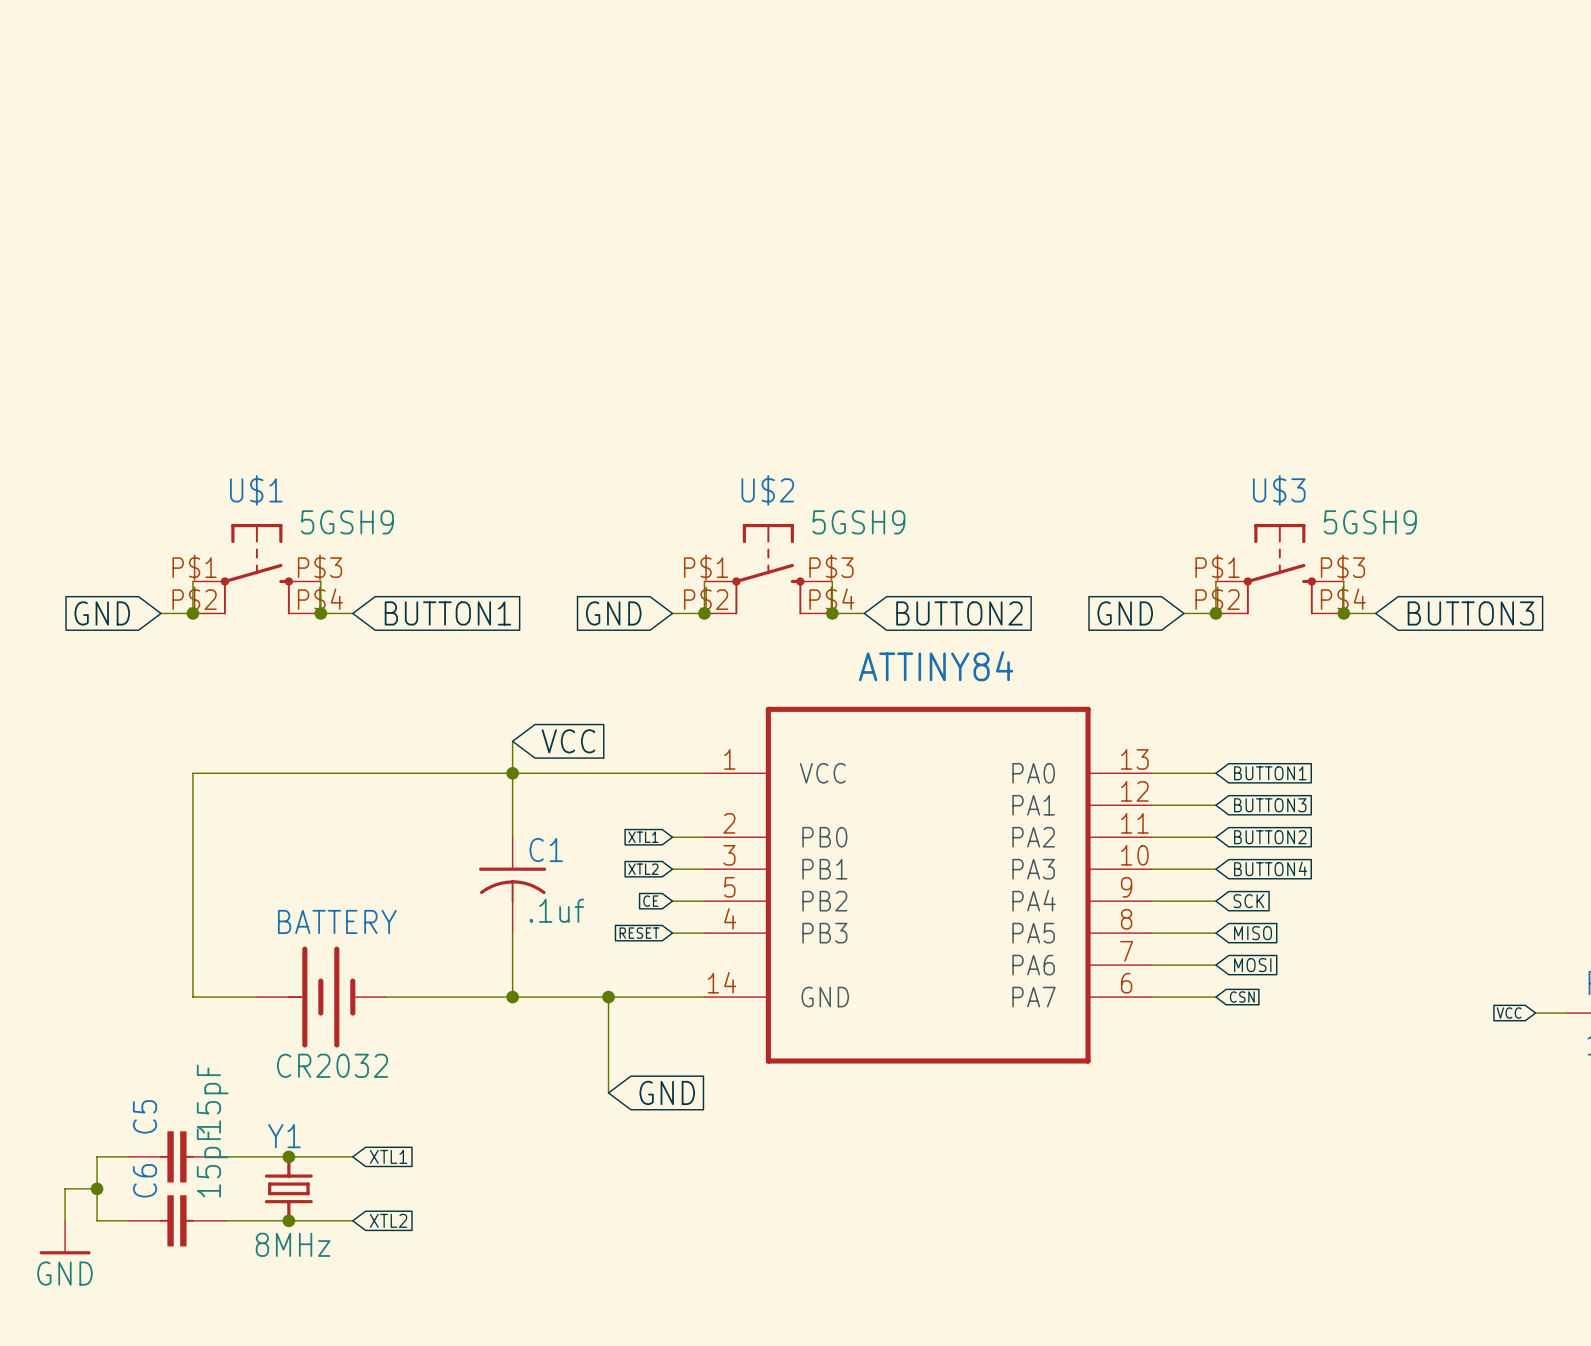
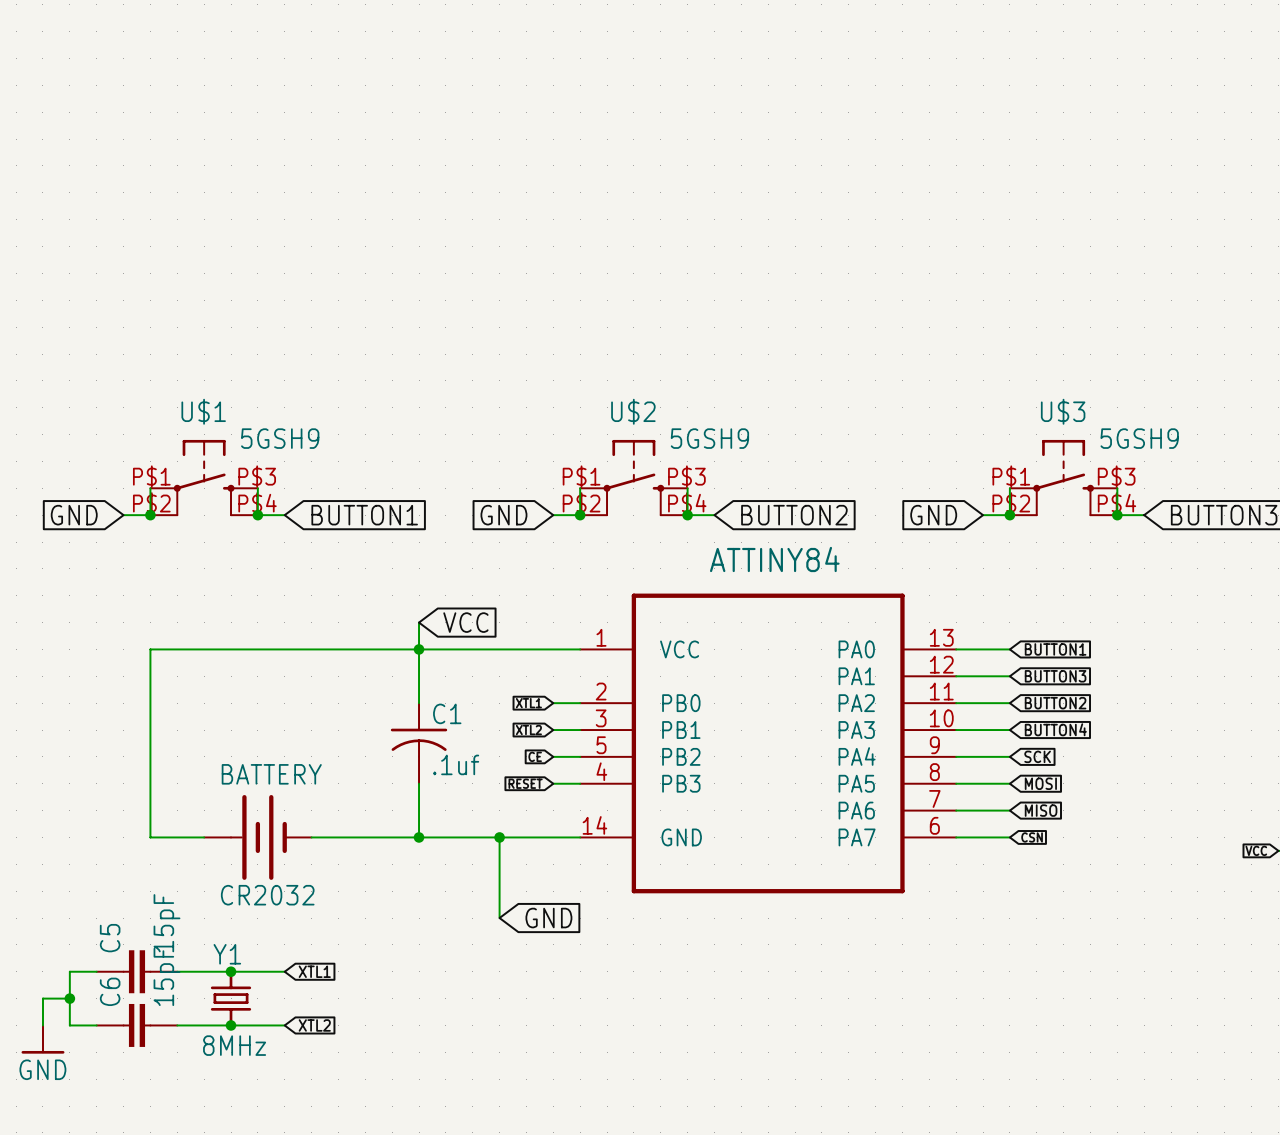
global label: MISO (1253, 933) -> MOSI (1040, 783)
global label: MOSI (1252, 965) -> MISO (1041, 810)

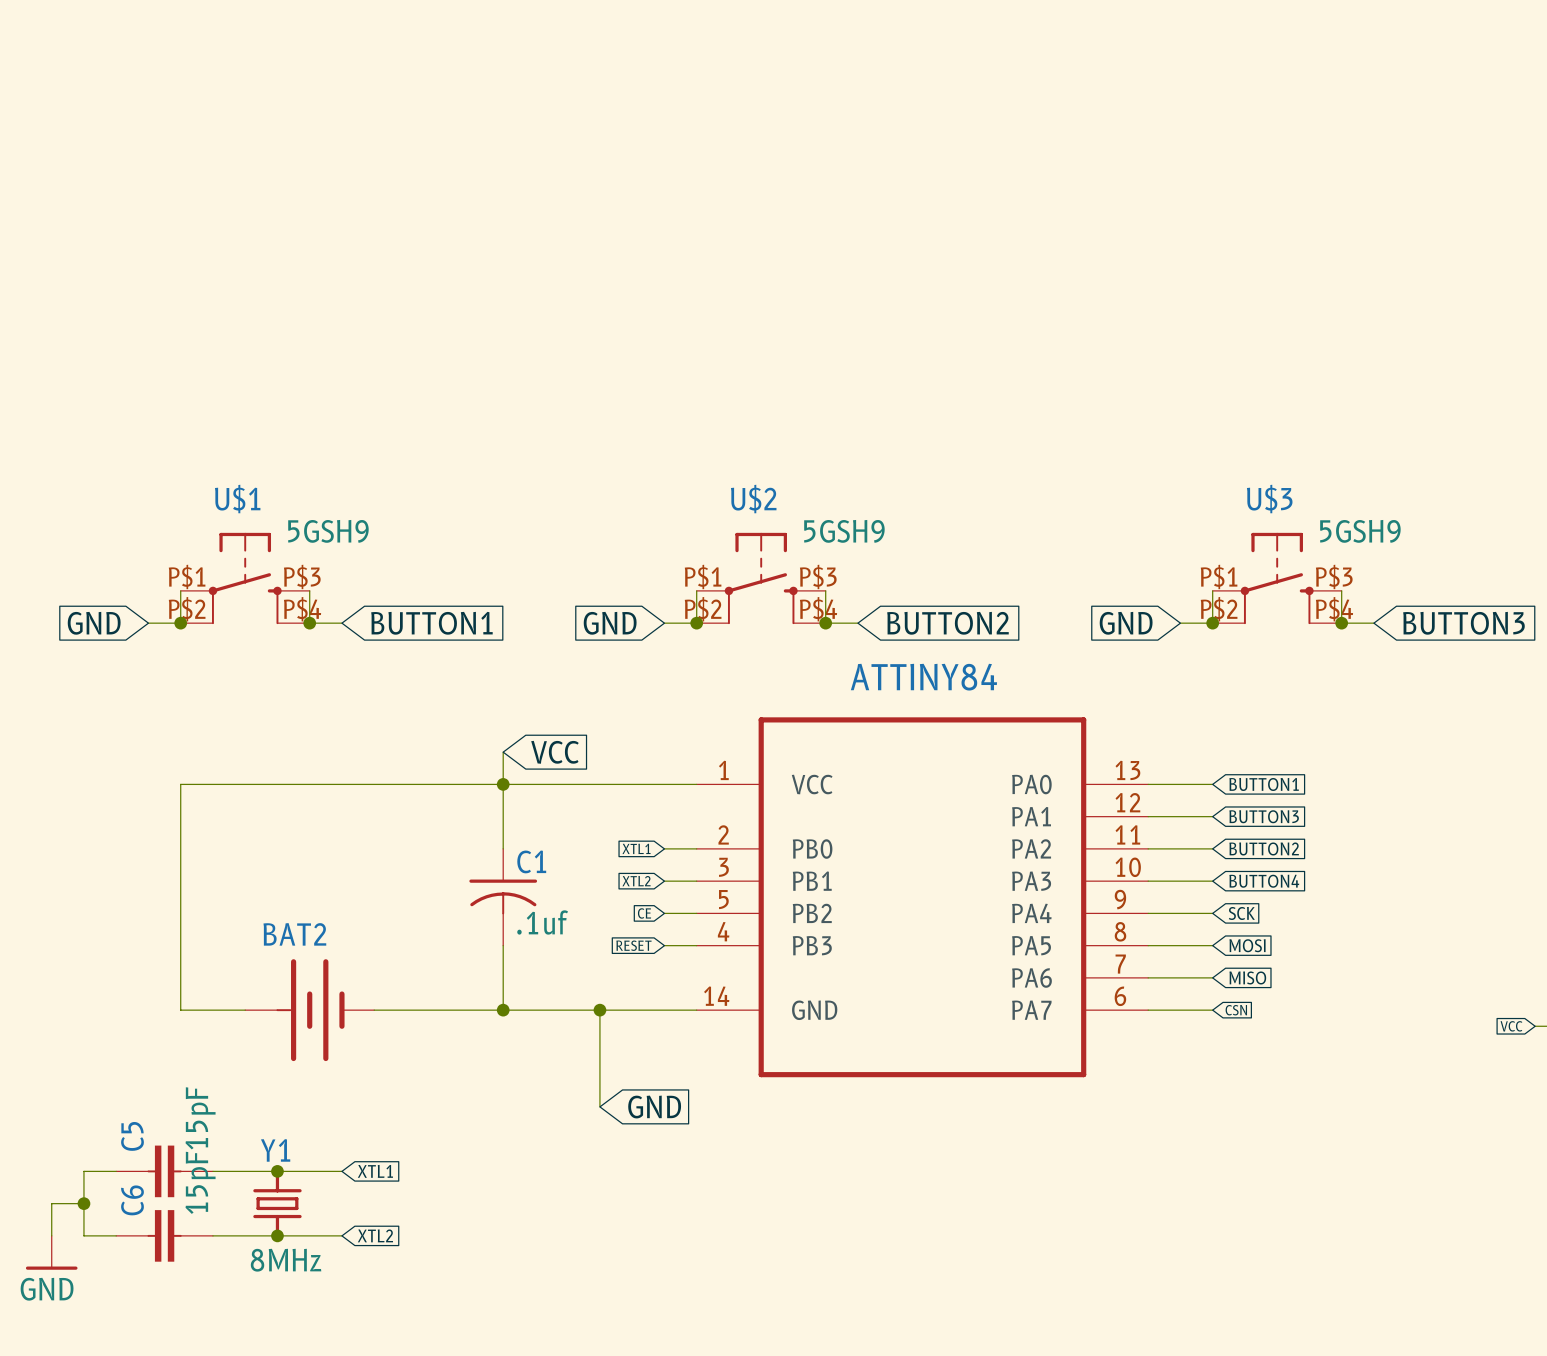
BATTERY name: BATTERY (271, 774) -> BAT2 (294, 934)
BATTERY value: CR2032 (267, 895) -> none

